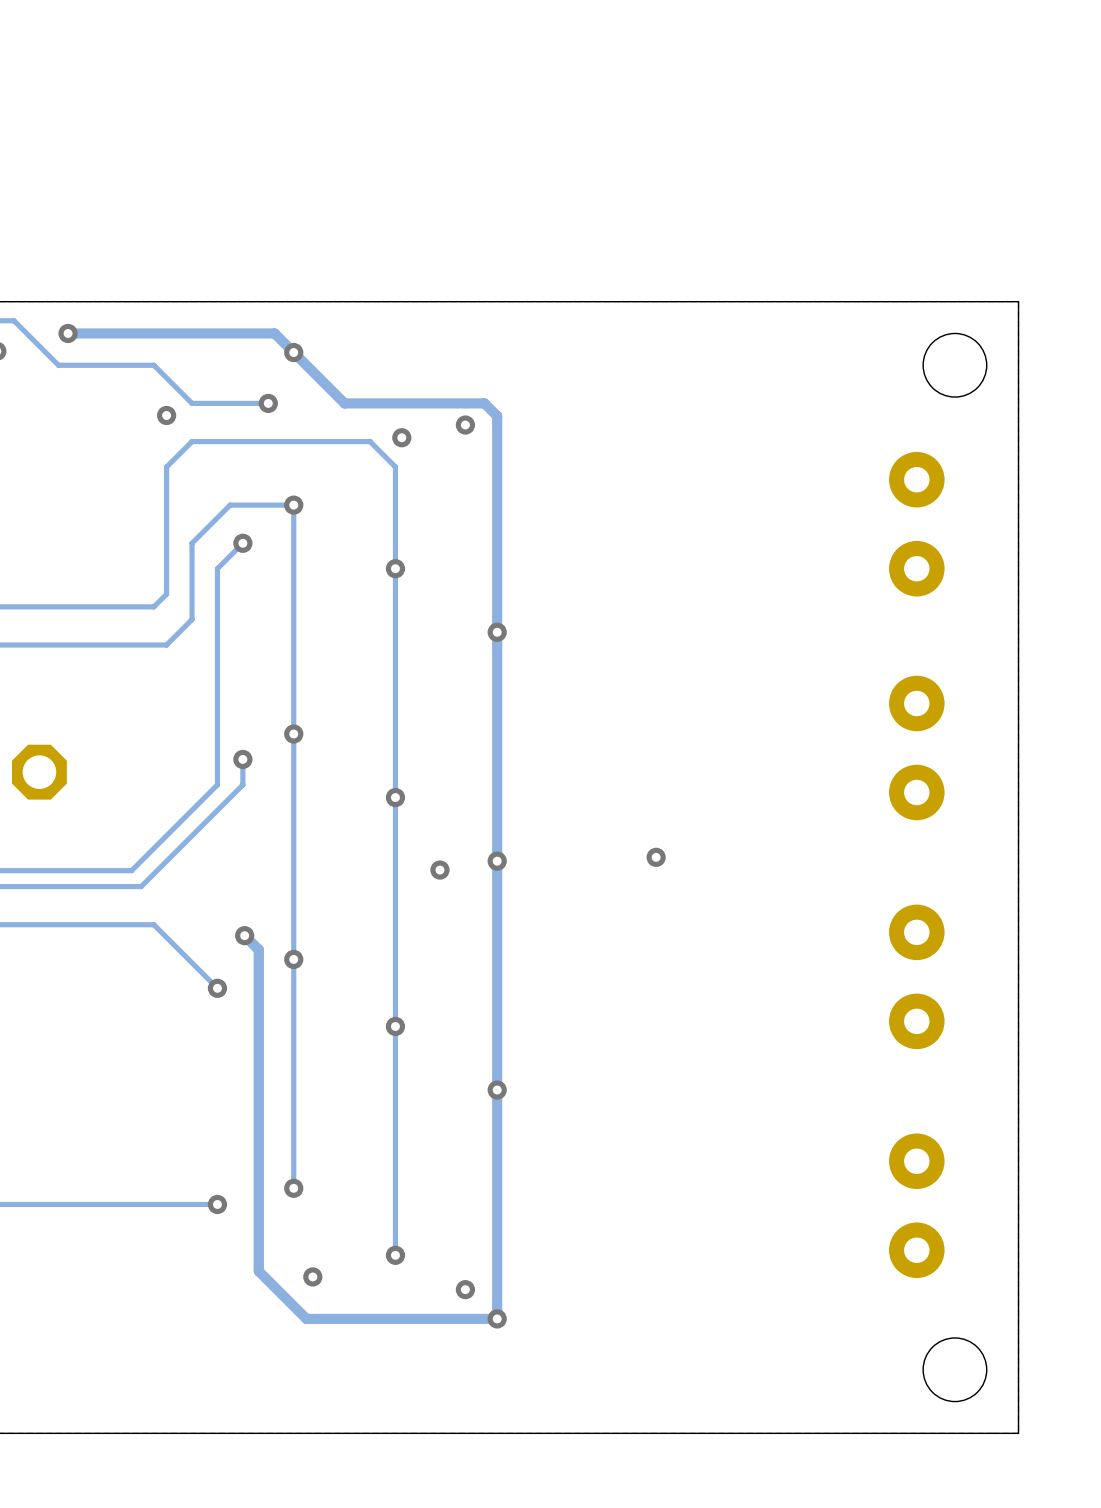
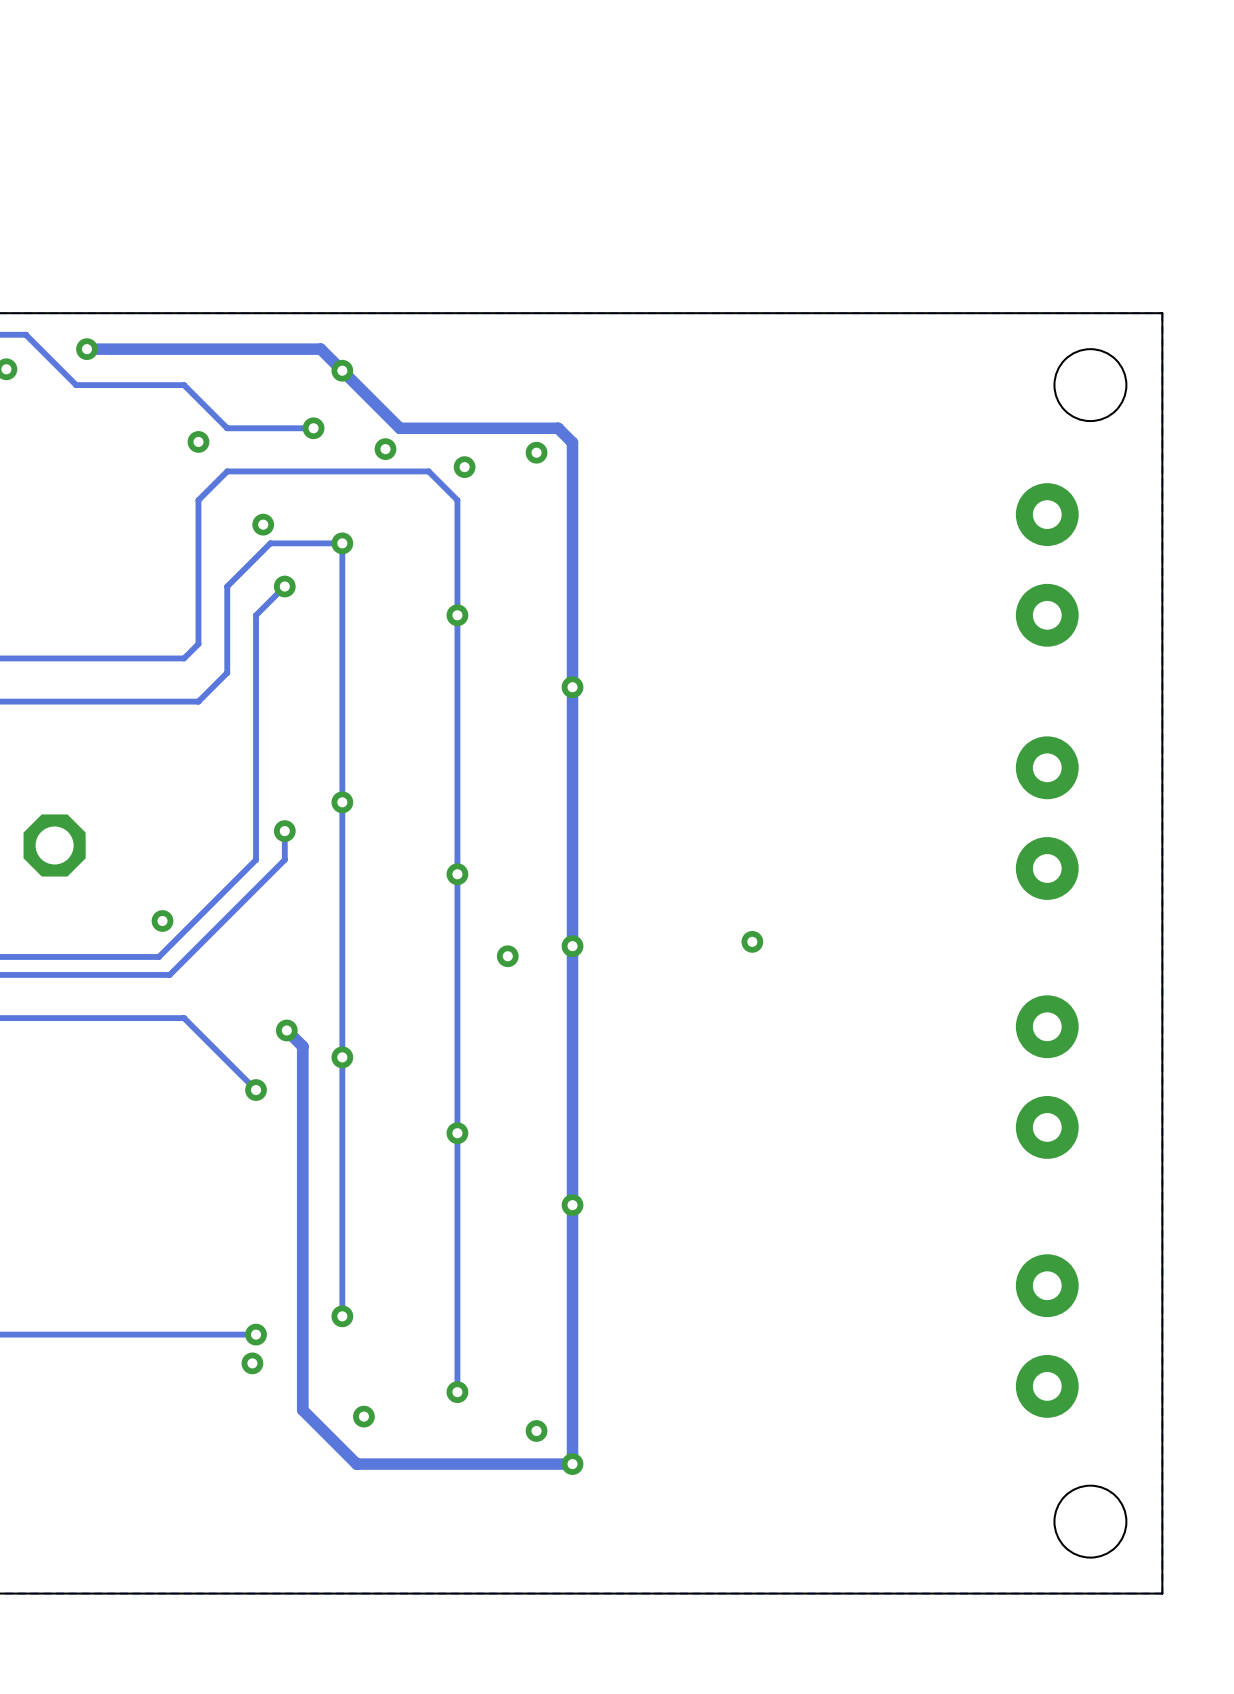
via: none -> (385, 449)
via: none -> (263, 524)
via: none -> (162, 921)
via: none -> (252, 1363)

